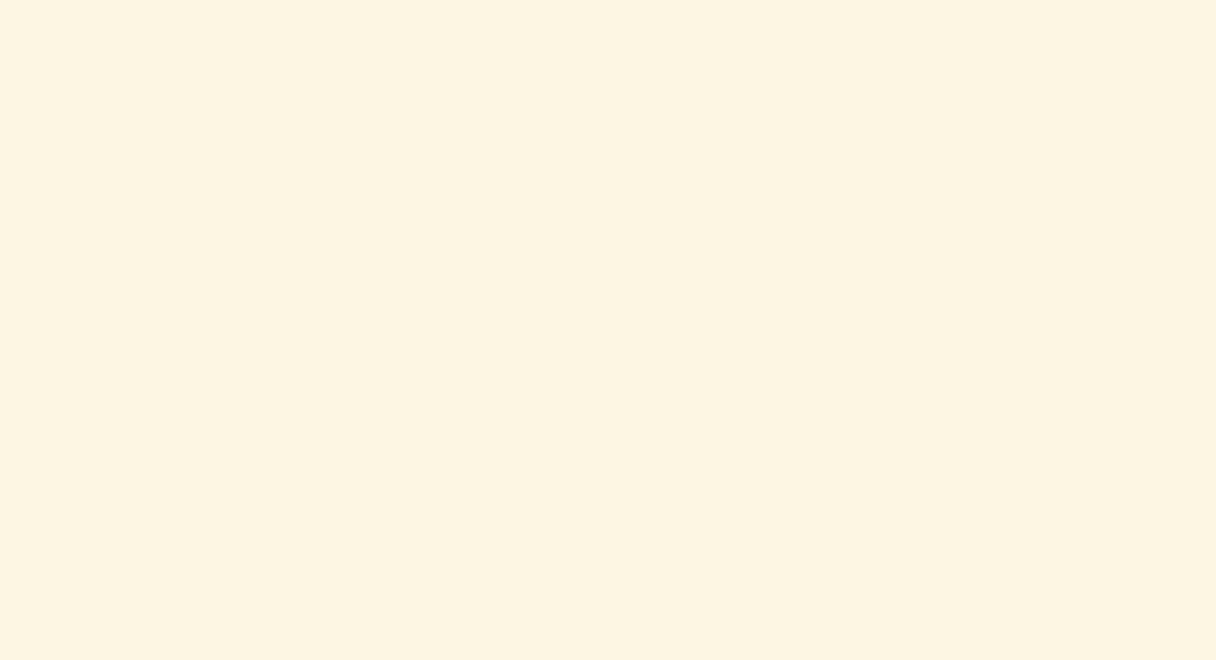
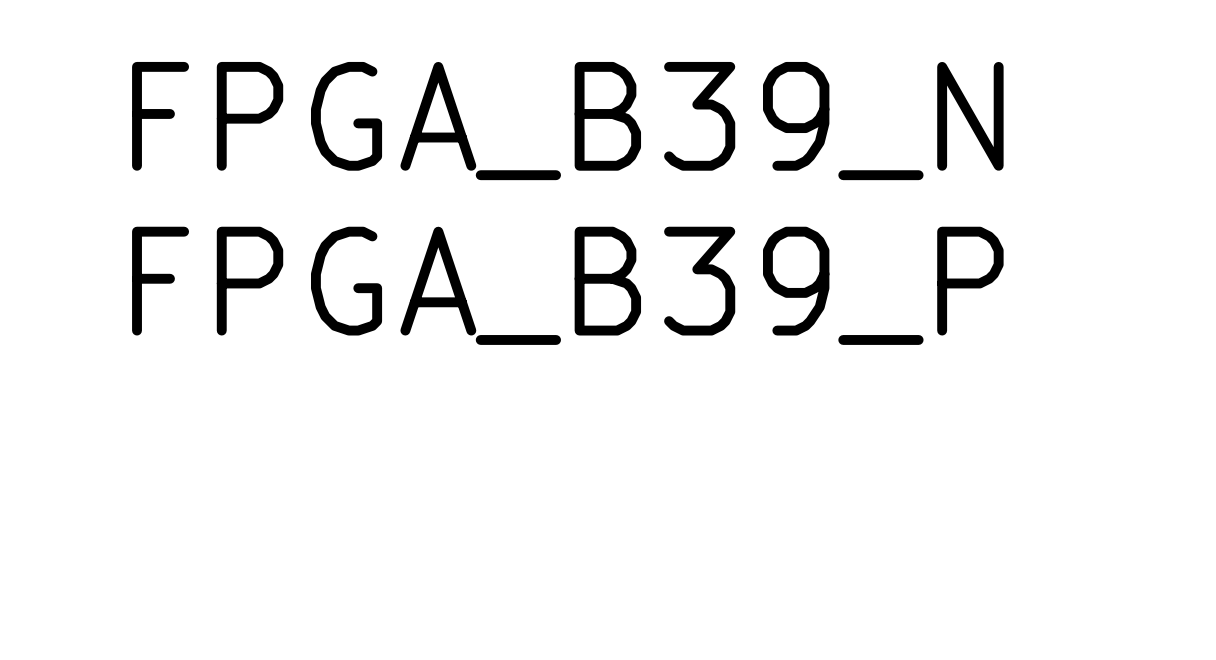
label: none -> FPGA_B39_N (567, 121)
label: none -> FPGA_B39_P (567, 285)

